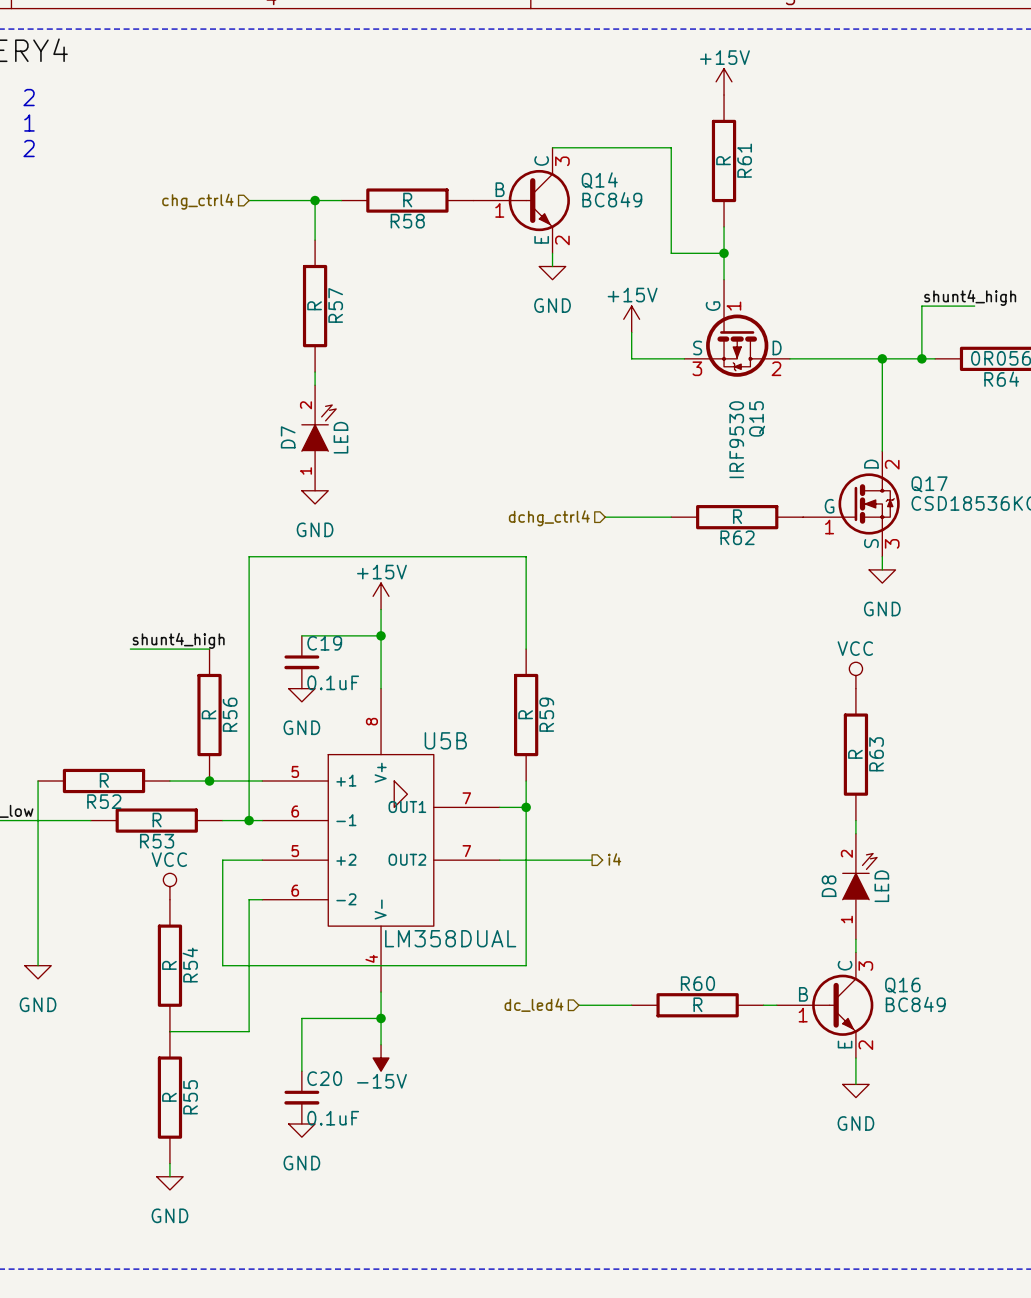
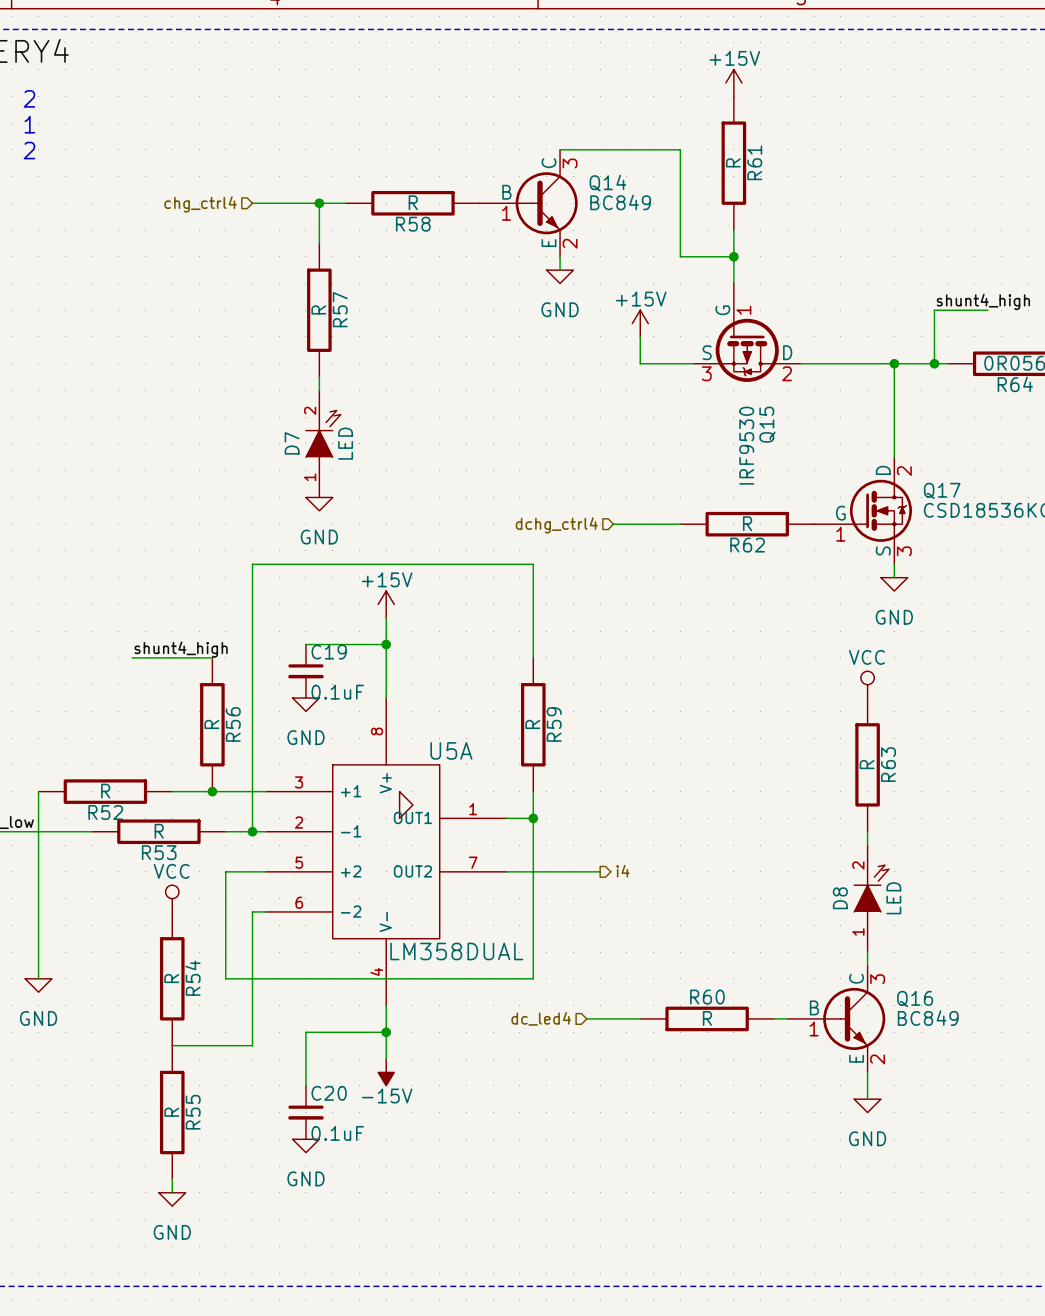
U5B name: U5B (445, 740) -> U5A (451, 750)
U5B pin number: 5 (295, 771) -> 3 (299, 782)
U5B pin number: 7 (466, 798) -> 1 (473, 809)
U5B pin number: 6 (295, 811) -> 2 (299, 822)

